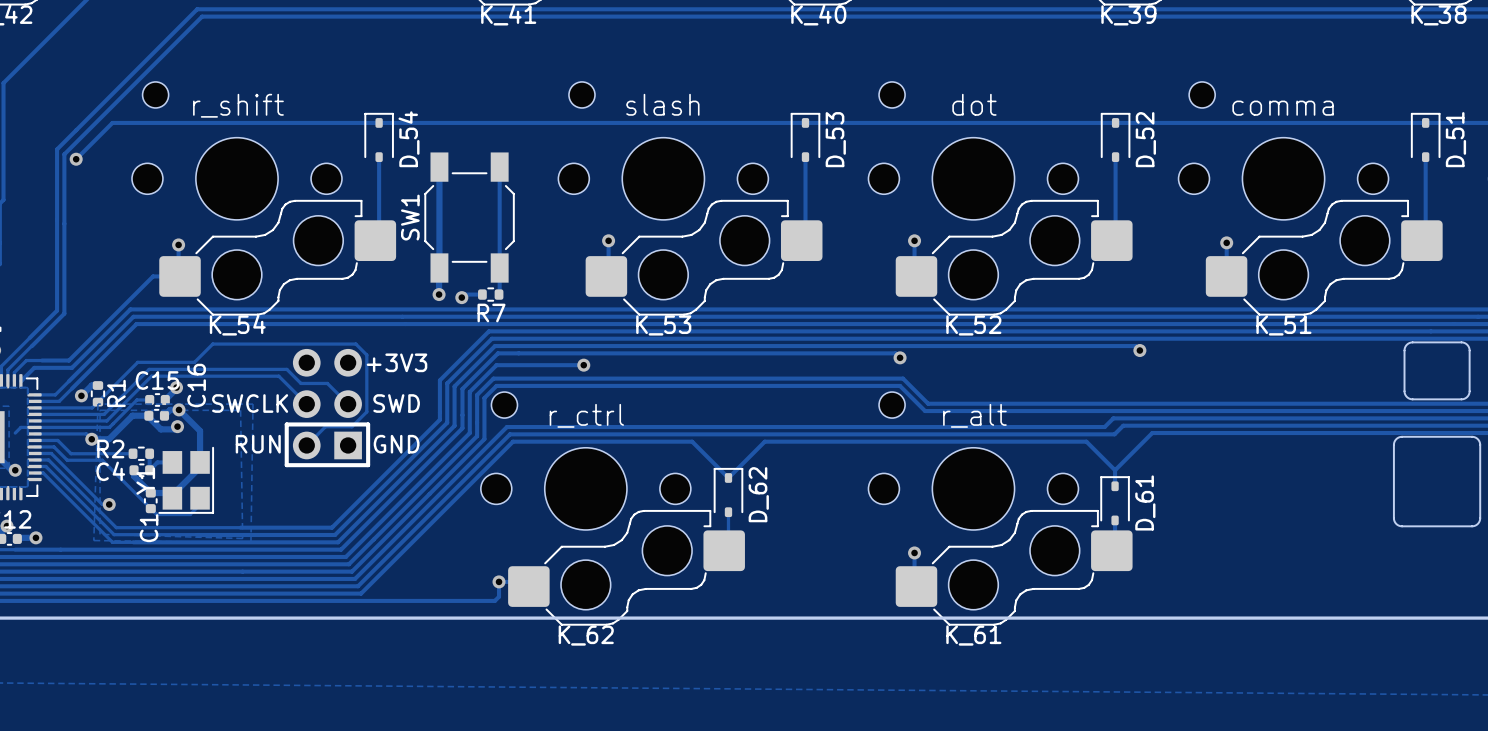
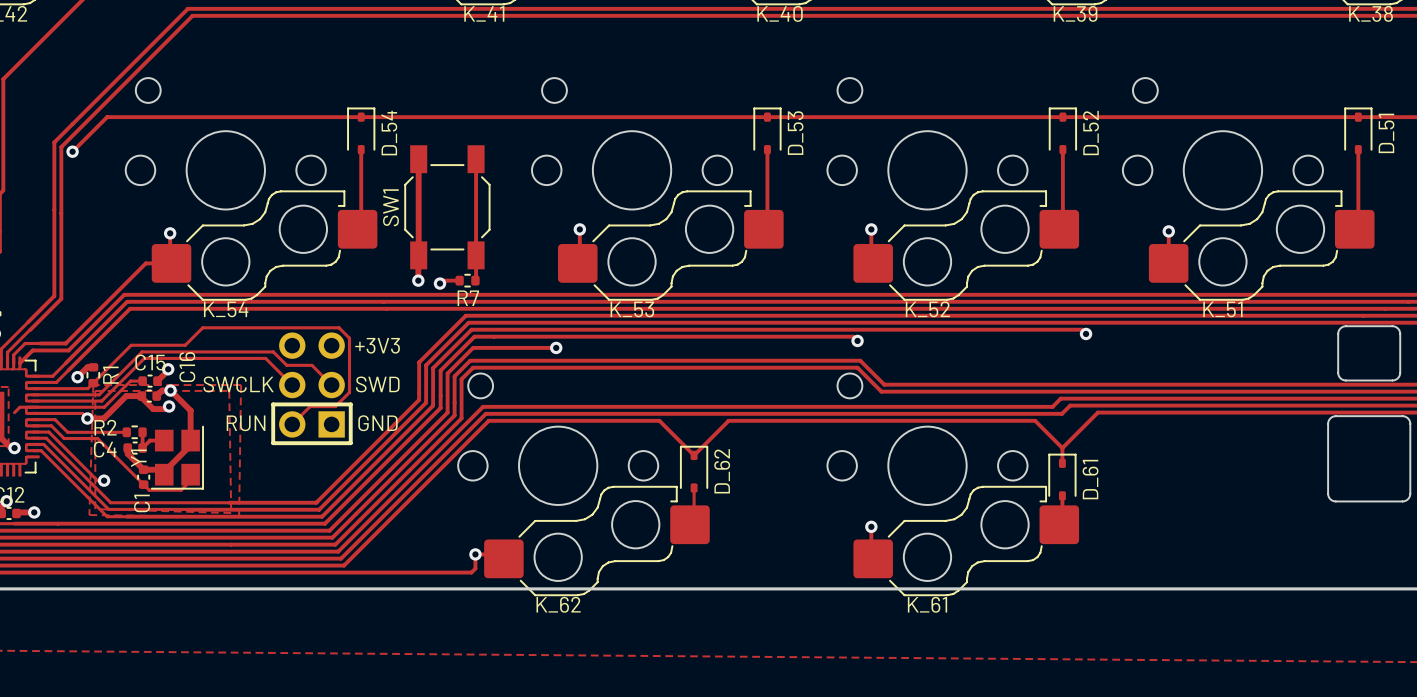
K_53 value: slash (662, 104) -> none
K_52 value: dot (974, 104) -> none
K_54 value: r_shift (238, 105) -> none
K_51 value: comma (1283, 108) -> none
K_62 value: r_ctrl (586, 415) -> none
K_61 value: r_alt (974, 415) -> none

